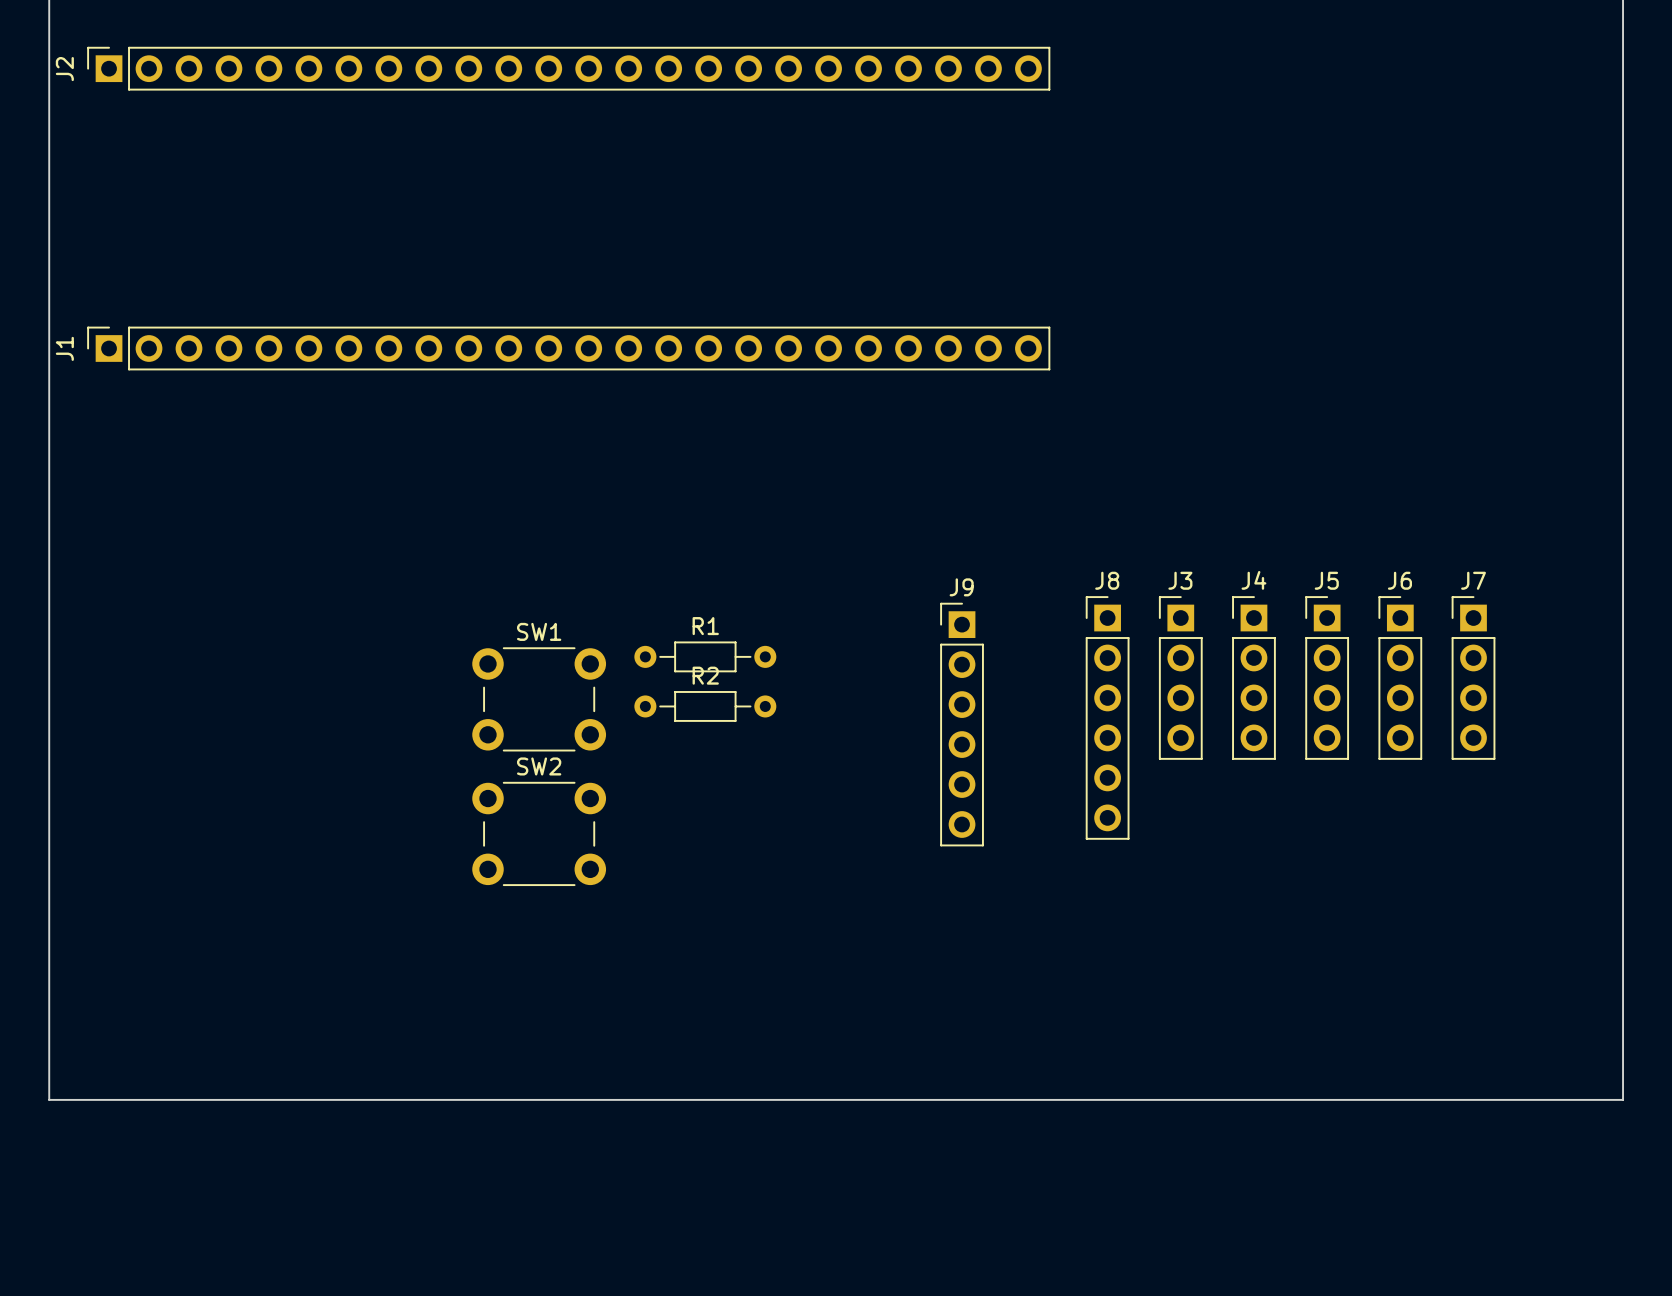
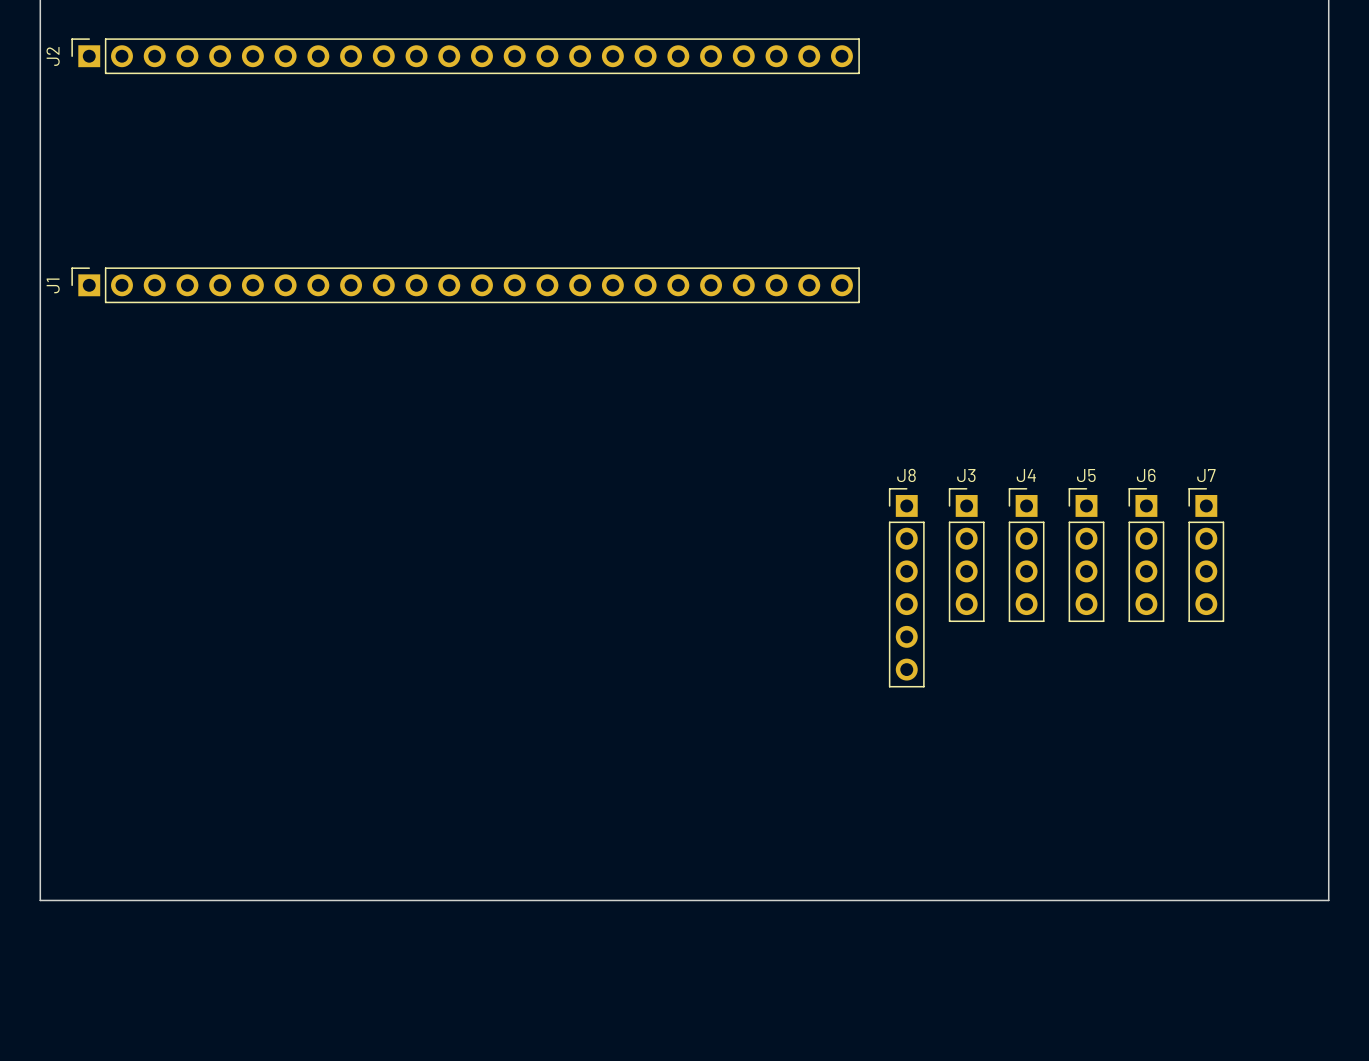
R1: (705, 656) -> none
SW1: (539, 699) -> none
R2: (705, 706) -> none
J9: (962, 724) -> none
SW2: (539, 833) -> none

